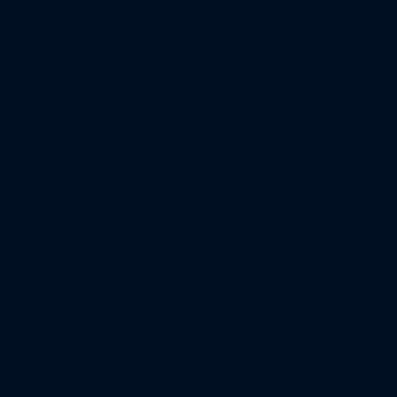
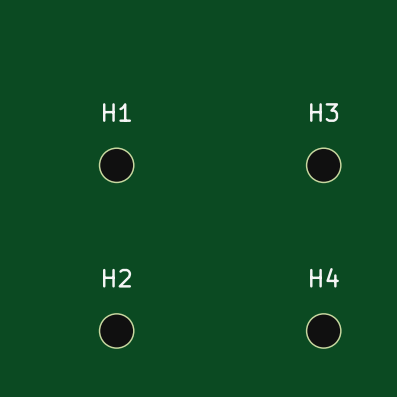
H1: none -> (116, 165)
H3: none -> (323, 165)
H2: none -> (116, 330)
H4: none -> (323, 330)

